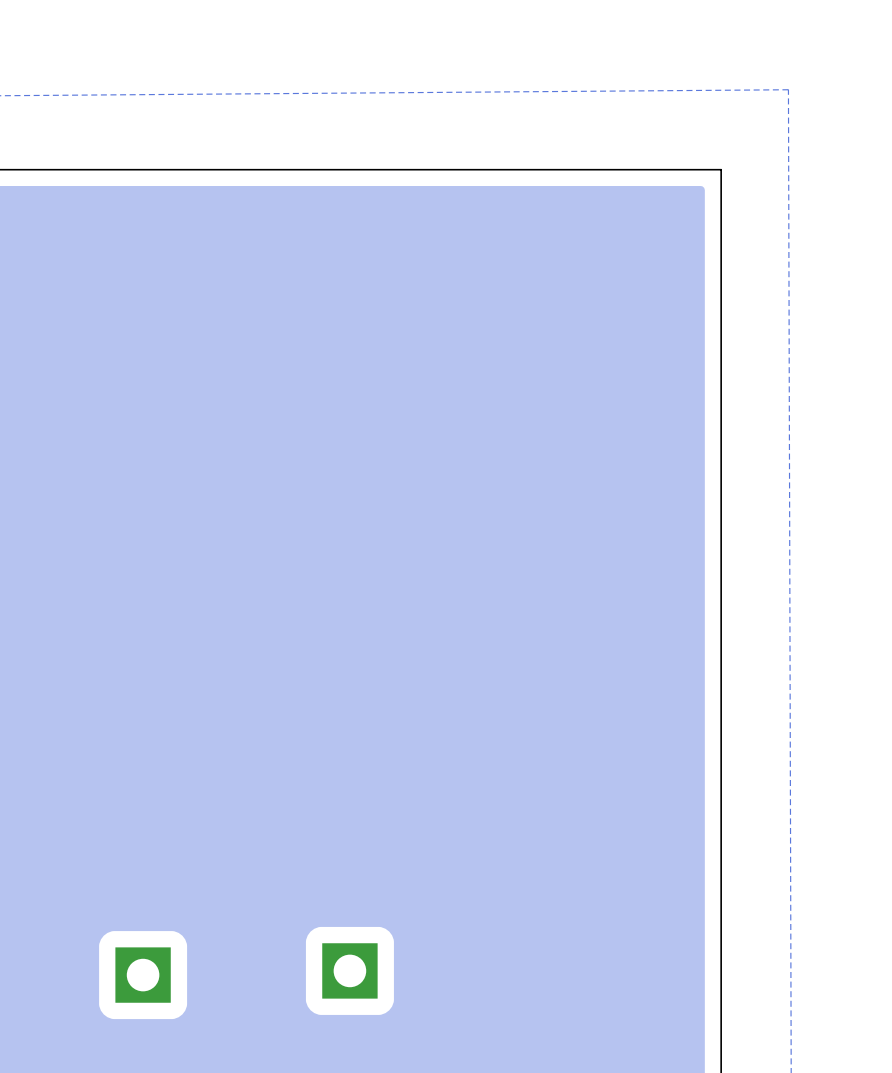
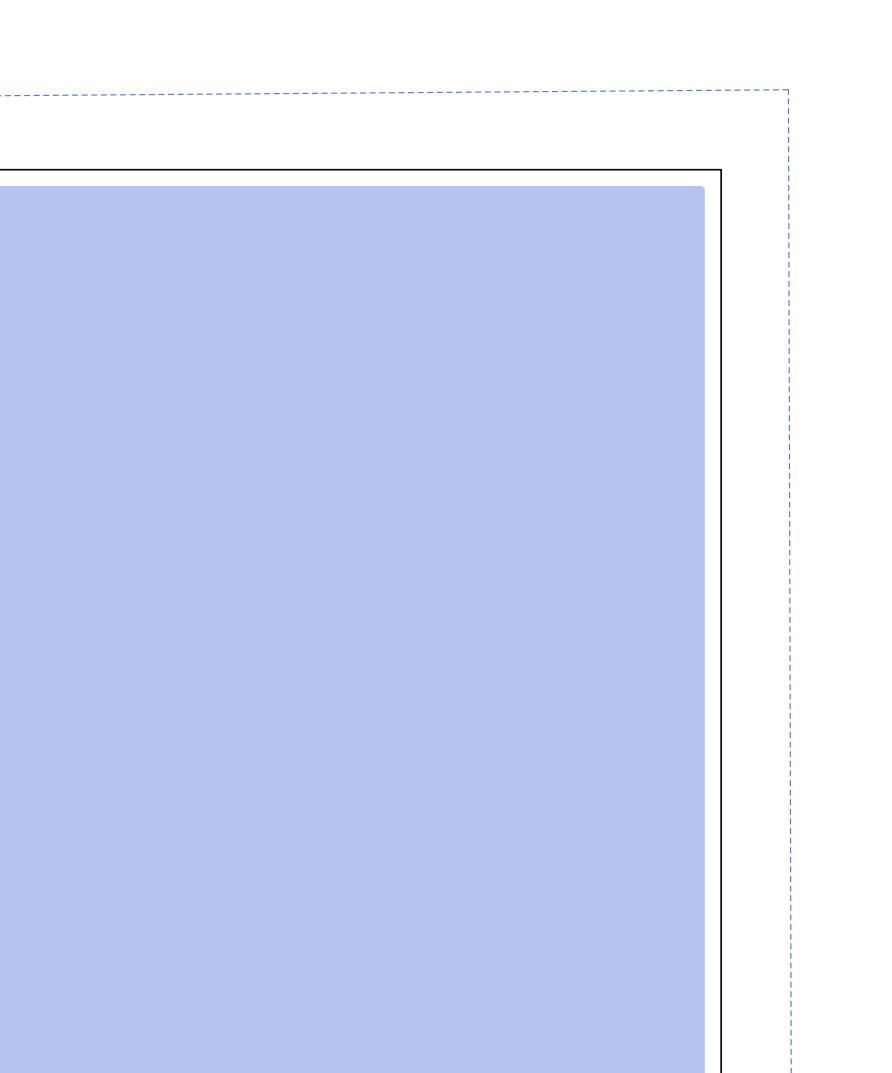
part: (349, 970) -> none
part: (143, 975) -> none

